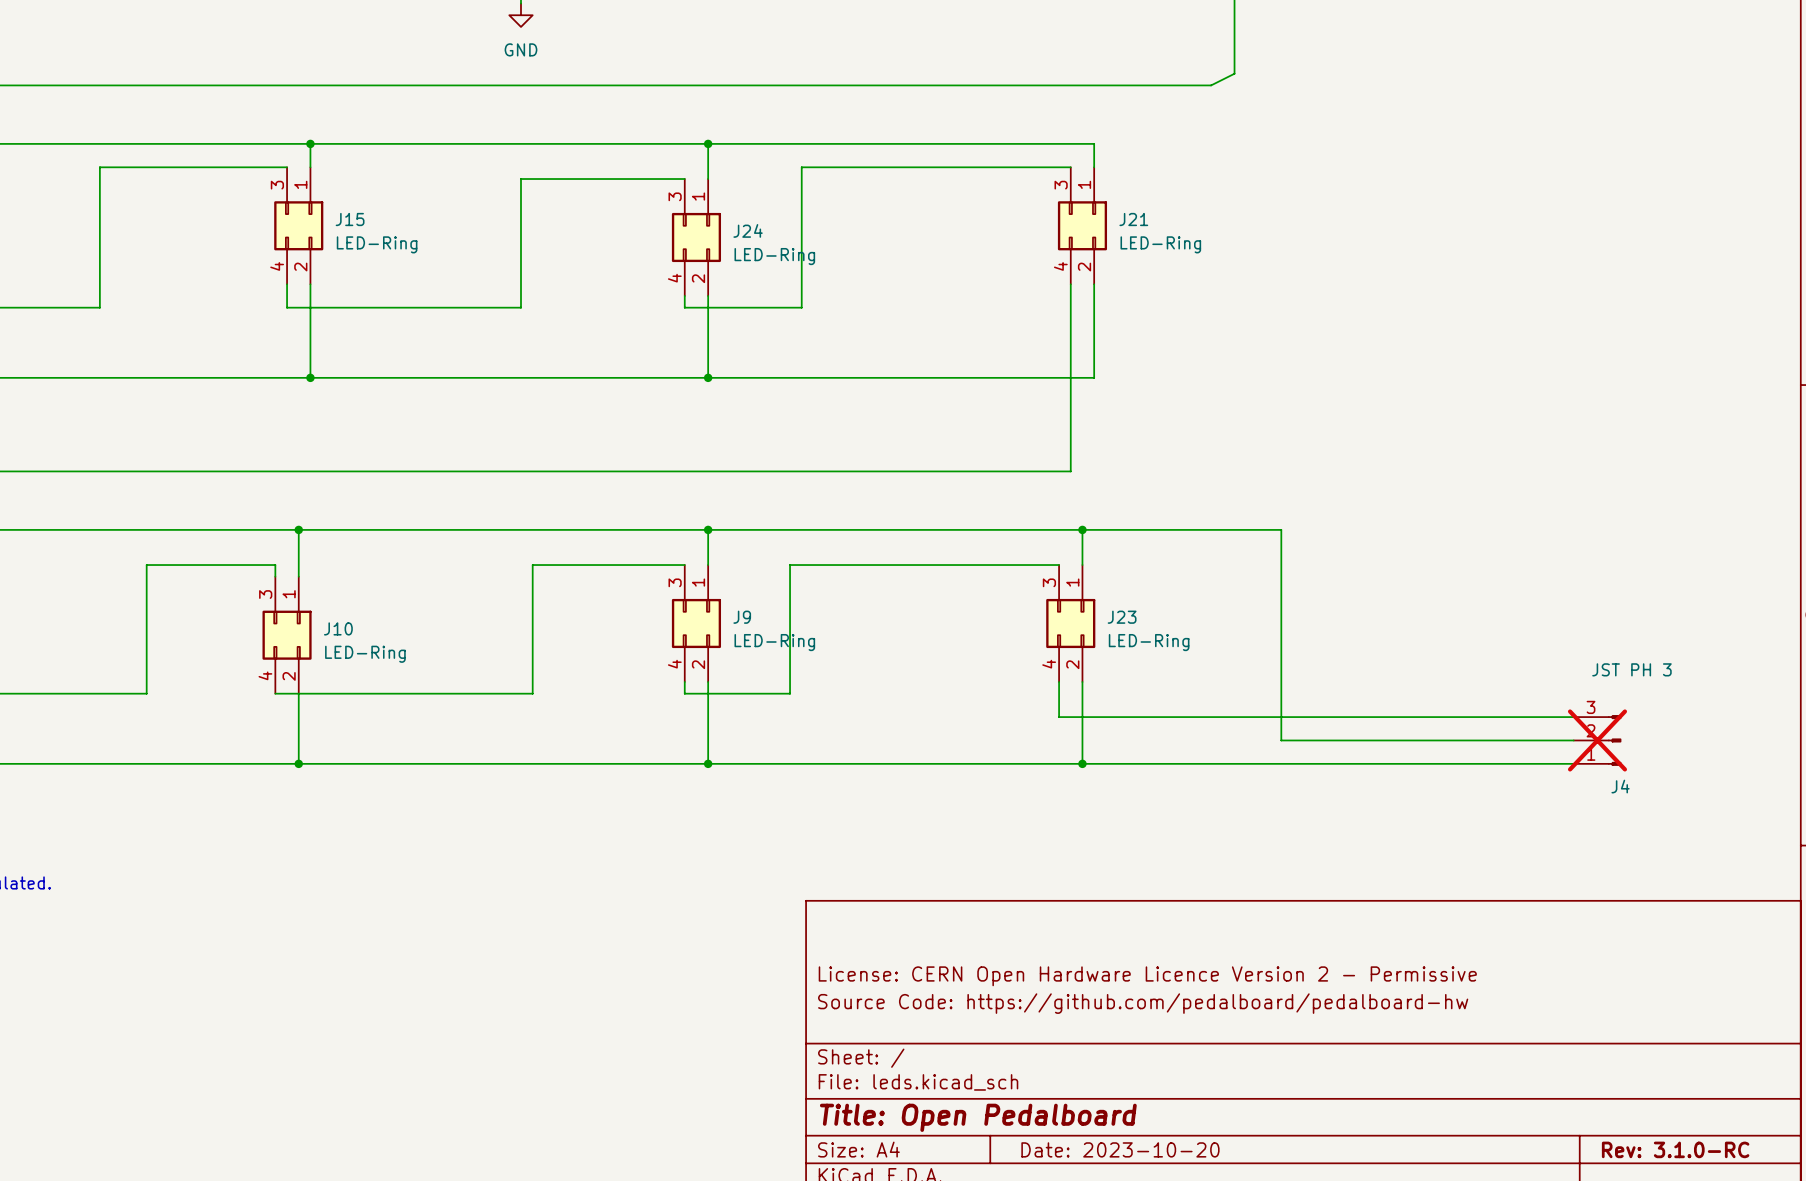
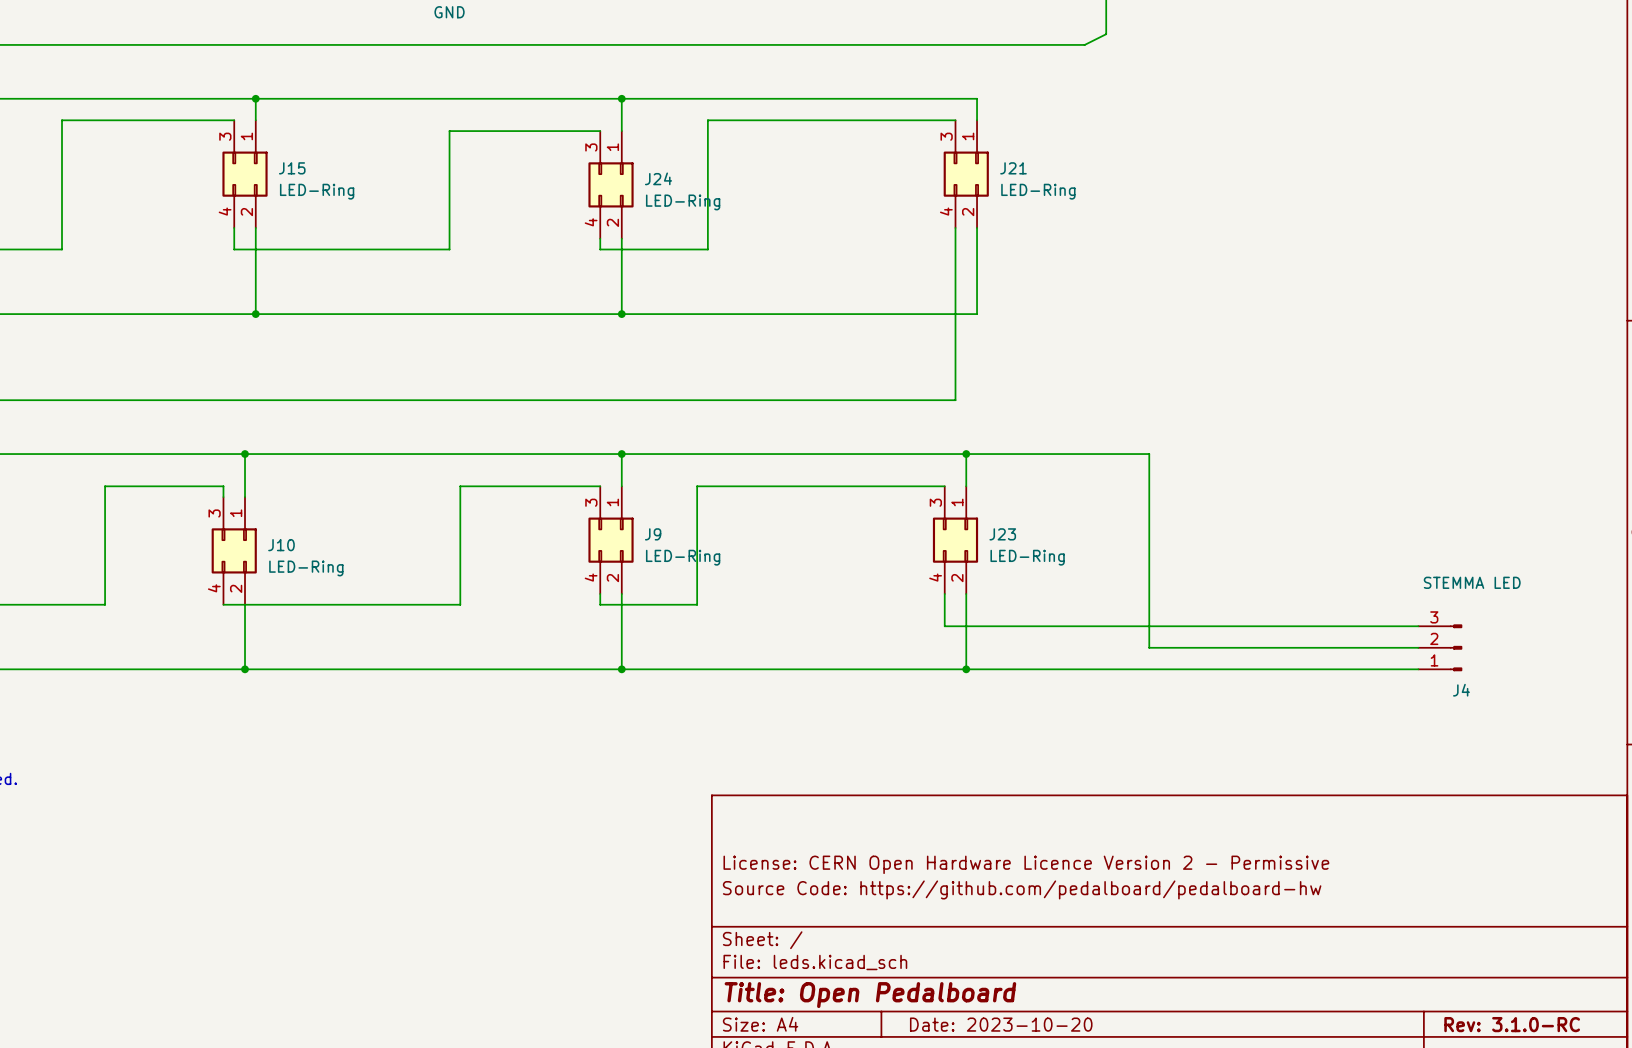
J4 value: JST PH 3 (1631, 669) -> STEMMA LED (1472, 582)
J4 do-not-place cross: (1597, 740) -> none

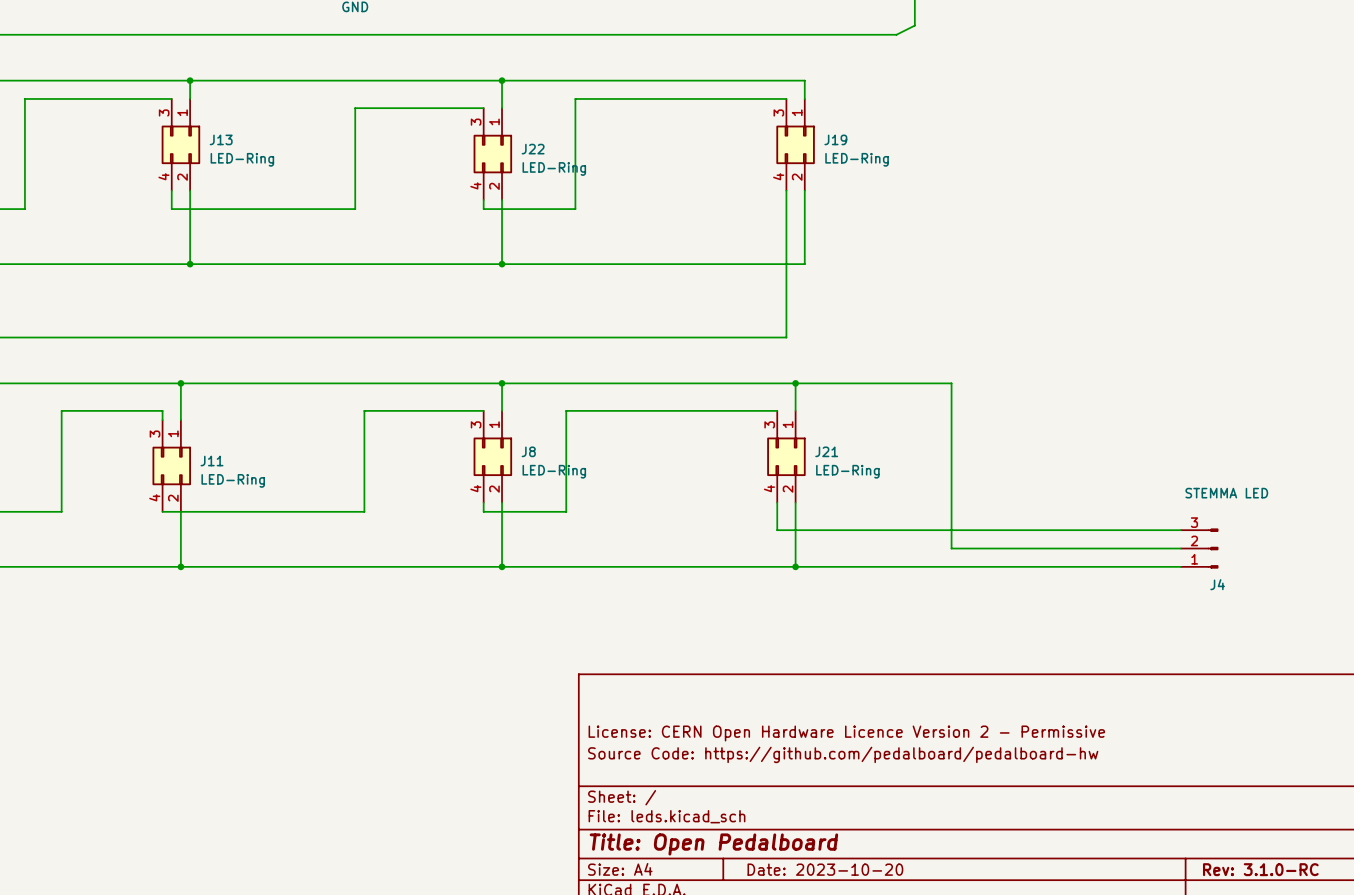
J15 name: J15 (292, 168) -> J13 (221, 139)
J21 name: J21 (1013, 168) -> J19 (835, 139)
J24 name: J24 (658, 178) -> J22 (533, 149)
J9 name: J9 (653, 534) -> J8 (528, 451)
J23 name: J23 (1002, 534) -> J21 (826, 451)
J10 name: J10 (281, 545) -> J11 (212, 461)

